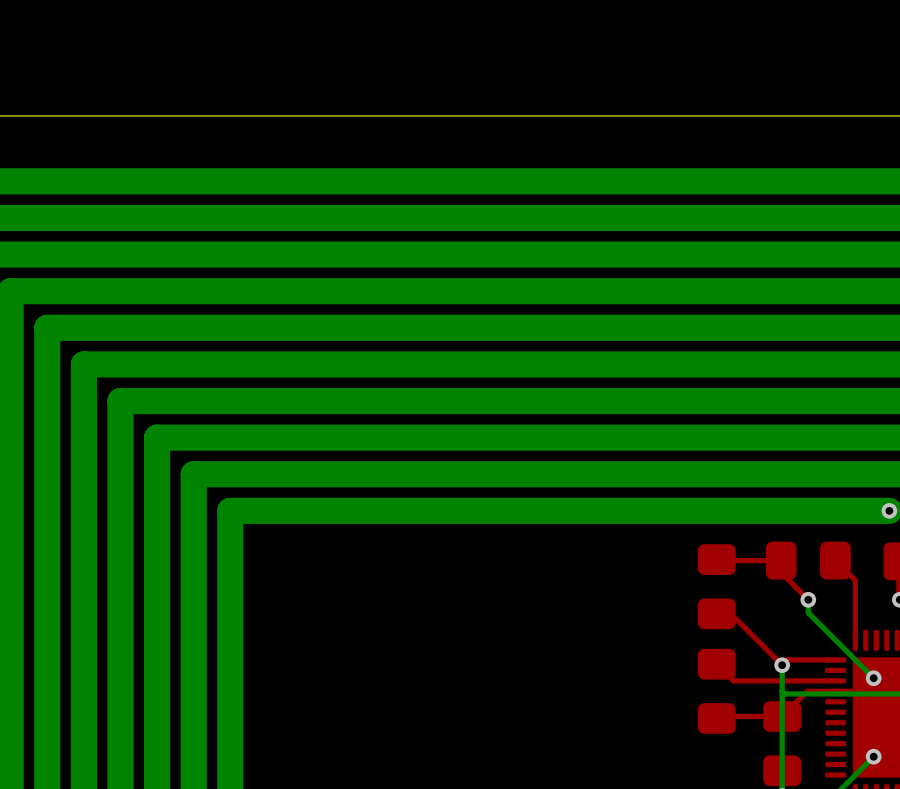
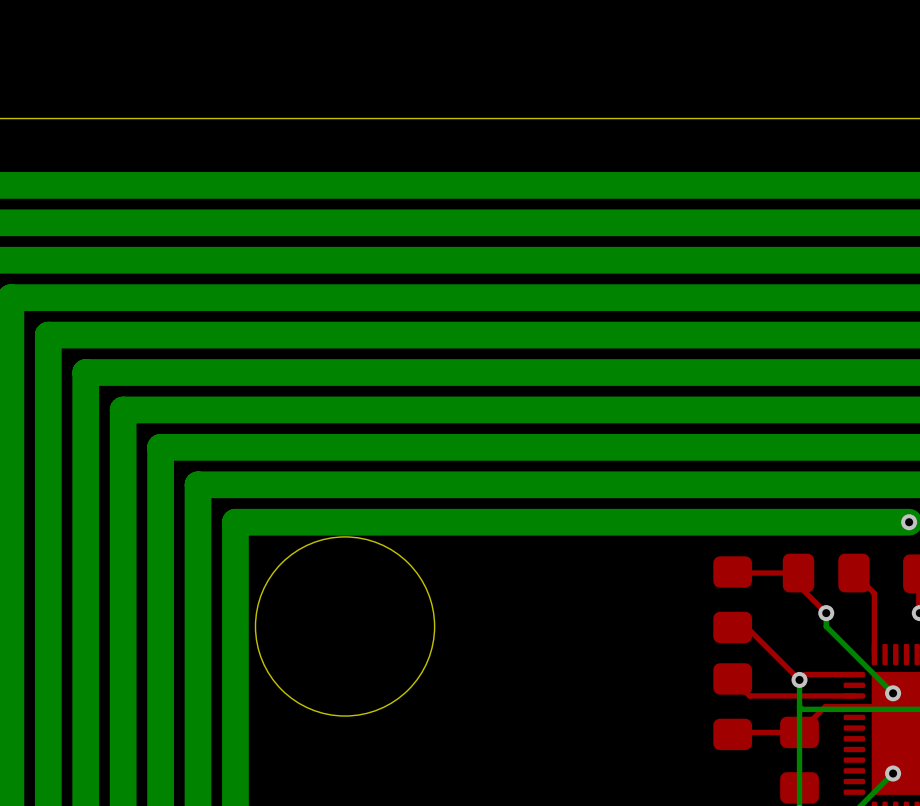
round board edge: none -> [254, 536, 436, 717]

